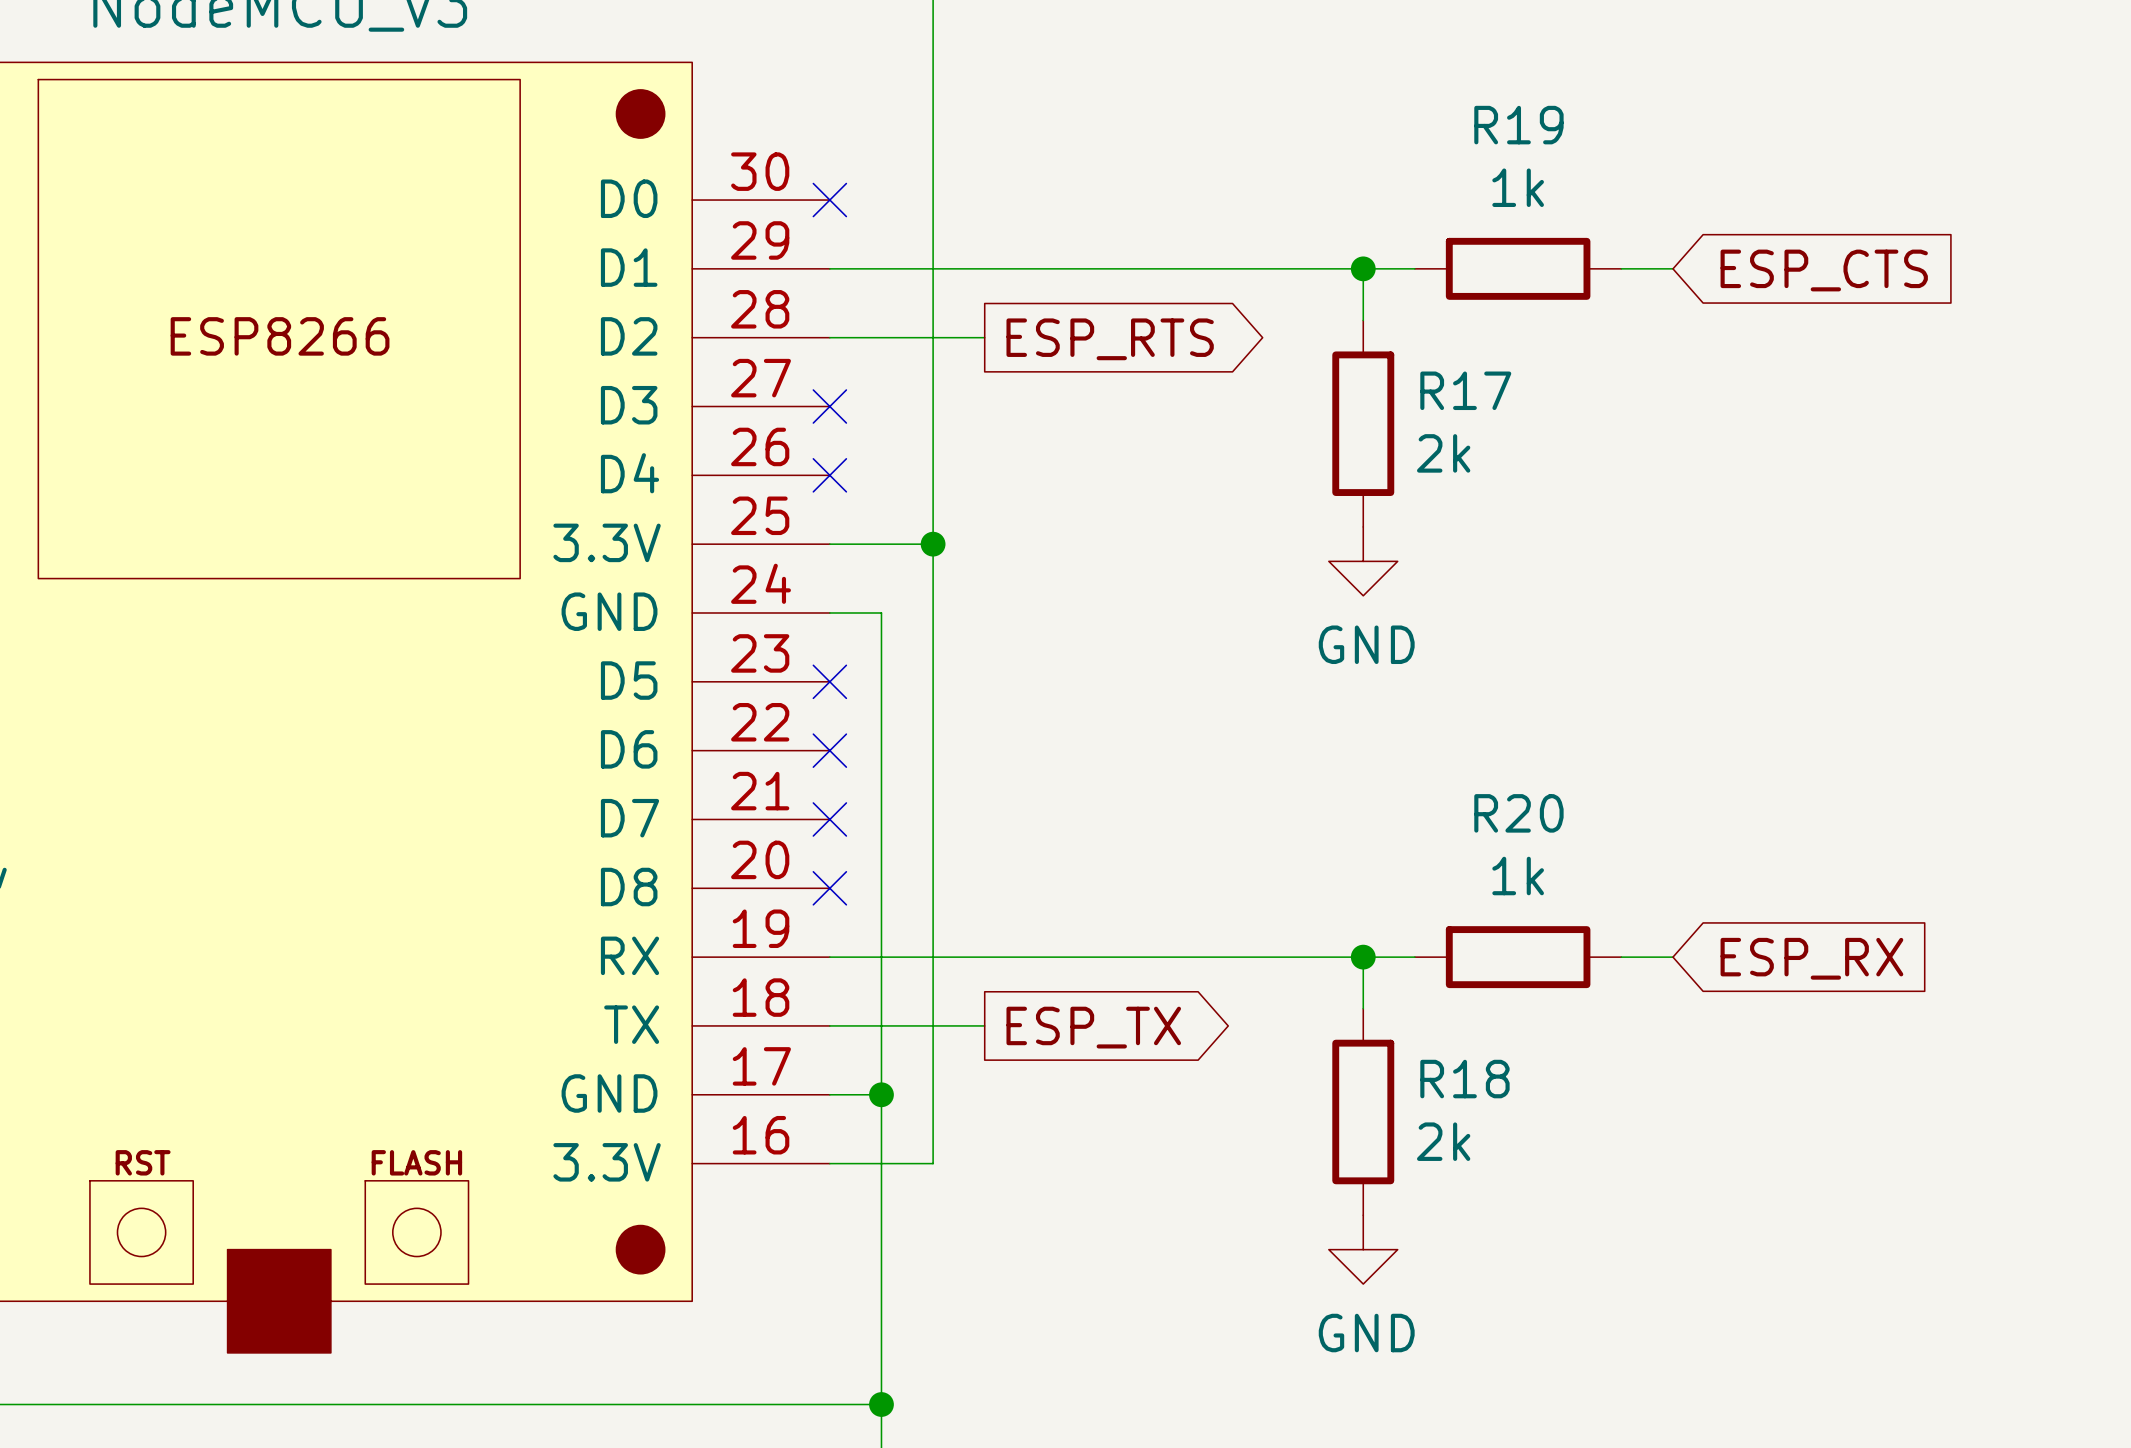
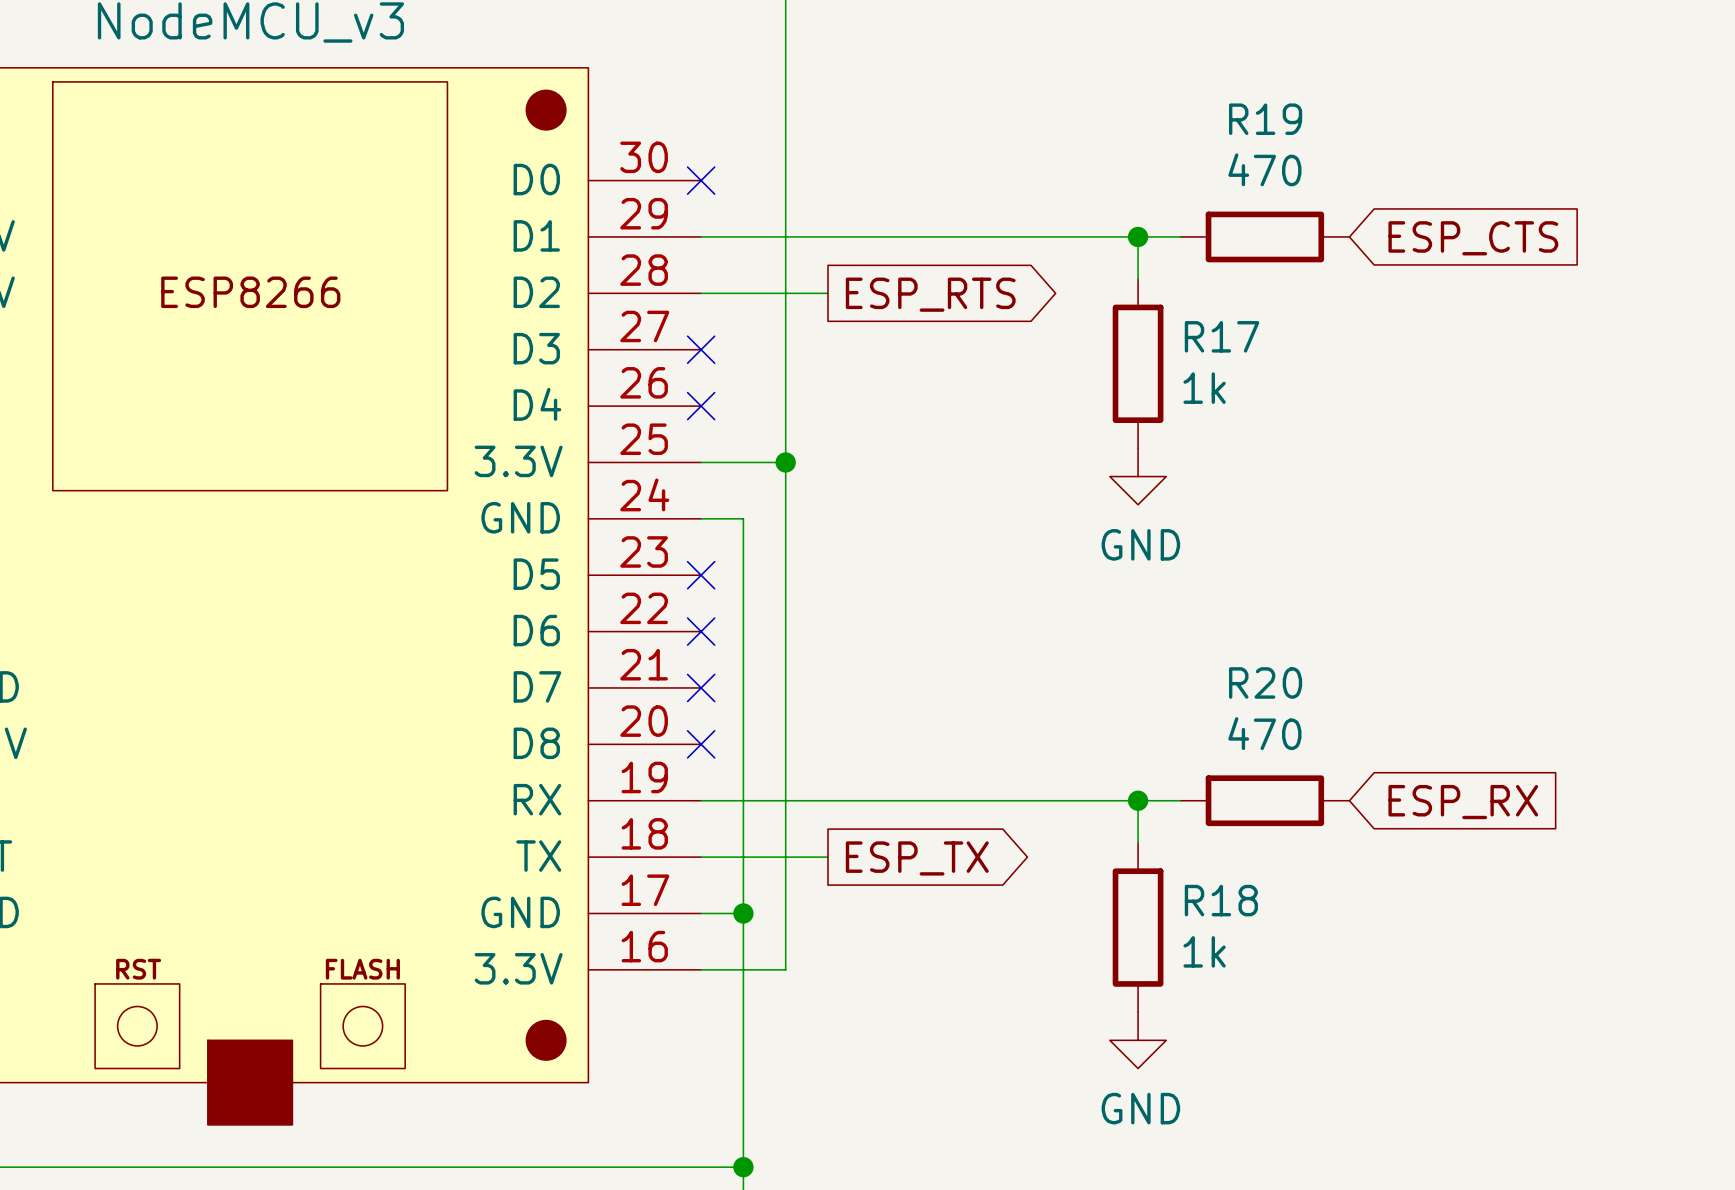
R19 value: 1k (1518, 187) -> 470 (1264, 169)
wire: (1621, 268) (1672, 268) -> none
global label position: ESP_CTS (1824, 270) -> ESP_CTS (1473, 238)
R17 value: 2k (1443, 453) -> 1k (1204, 388)
R20 value: 1k (1518, 876) -> 470 (1264, 733)
wire: (1621, 957) (1672, 957) -> none
global label position: ESP_RX (1811, 958) -> ESP_RX (1463, 802)
R18 value: 2k (1443, 1141) -> 1k (1204, 951)

